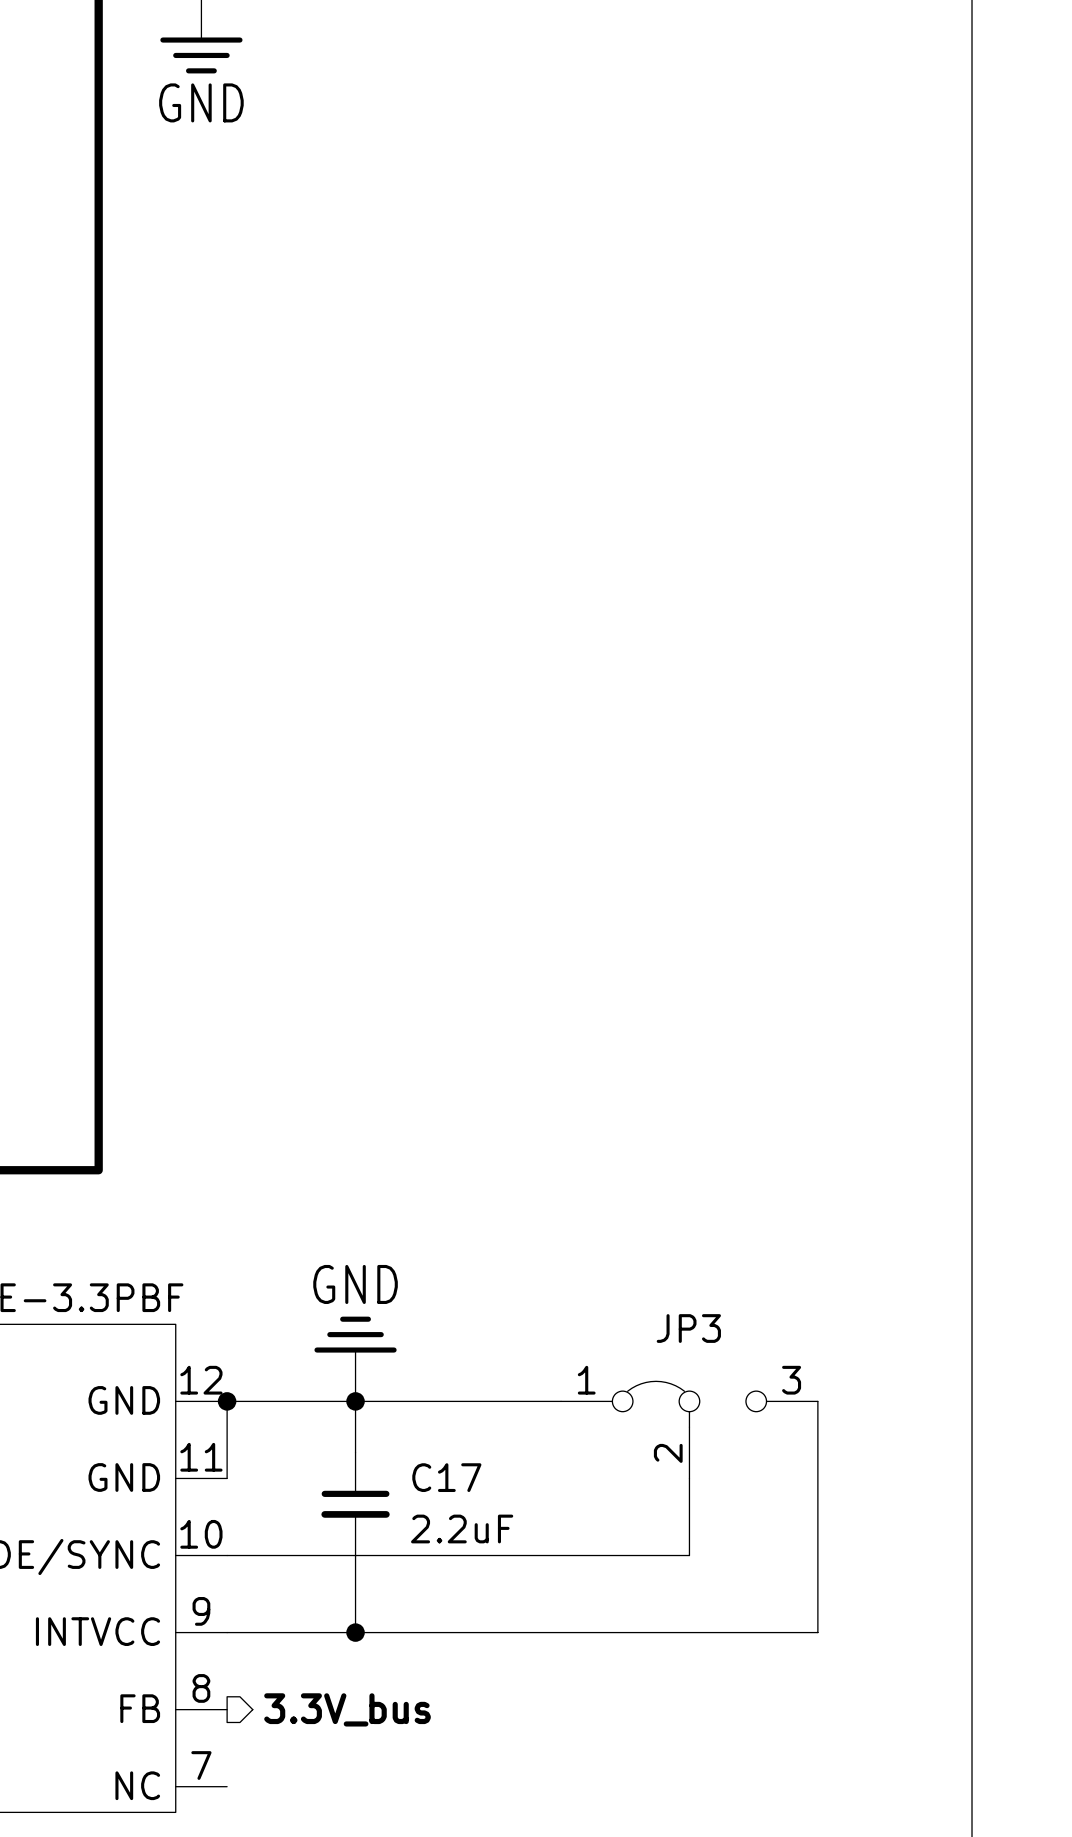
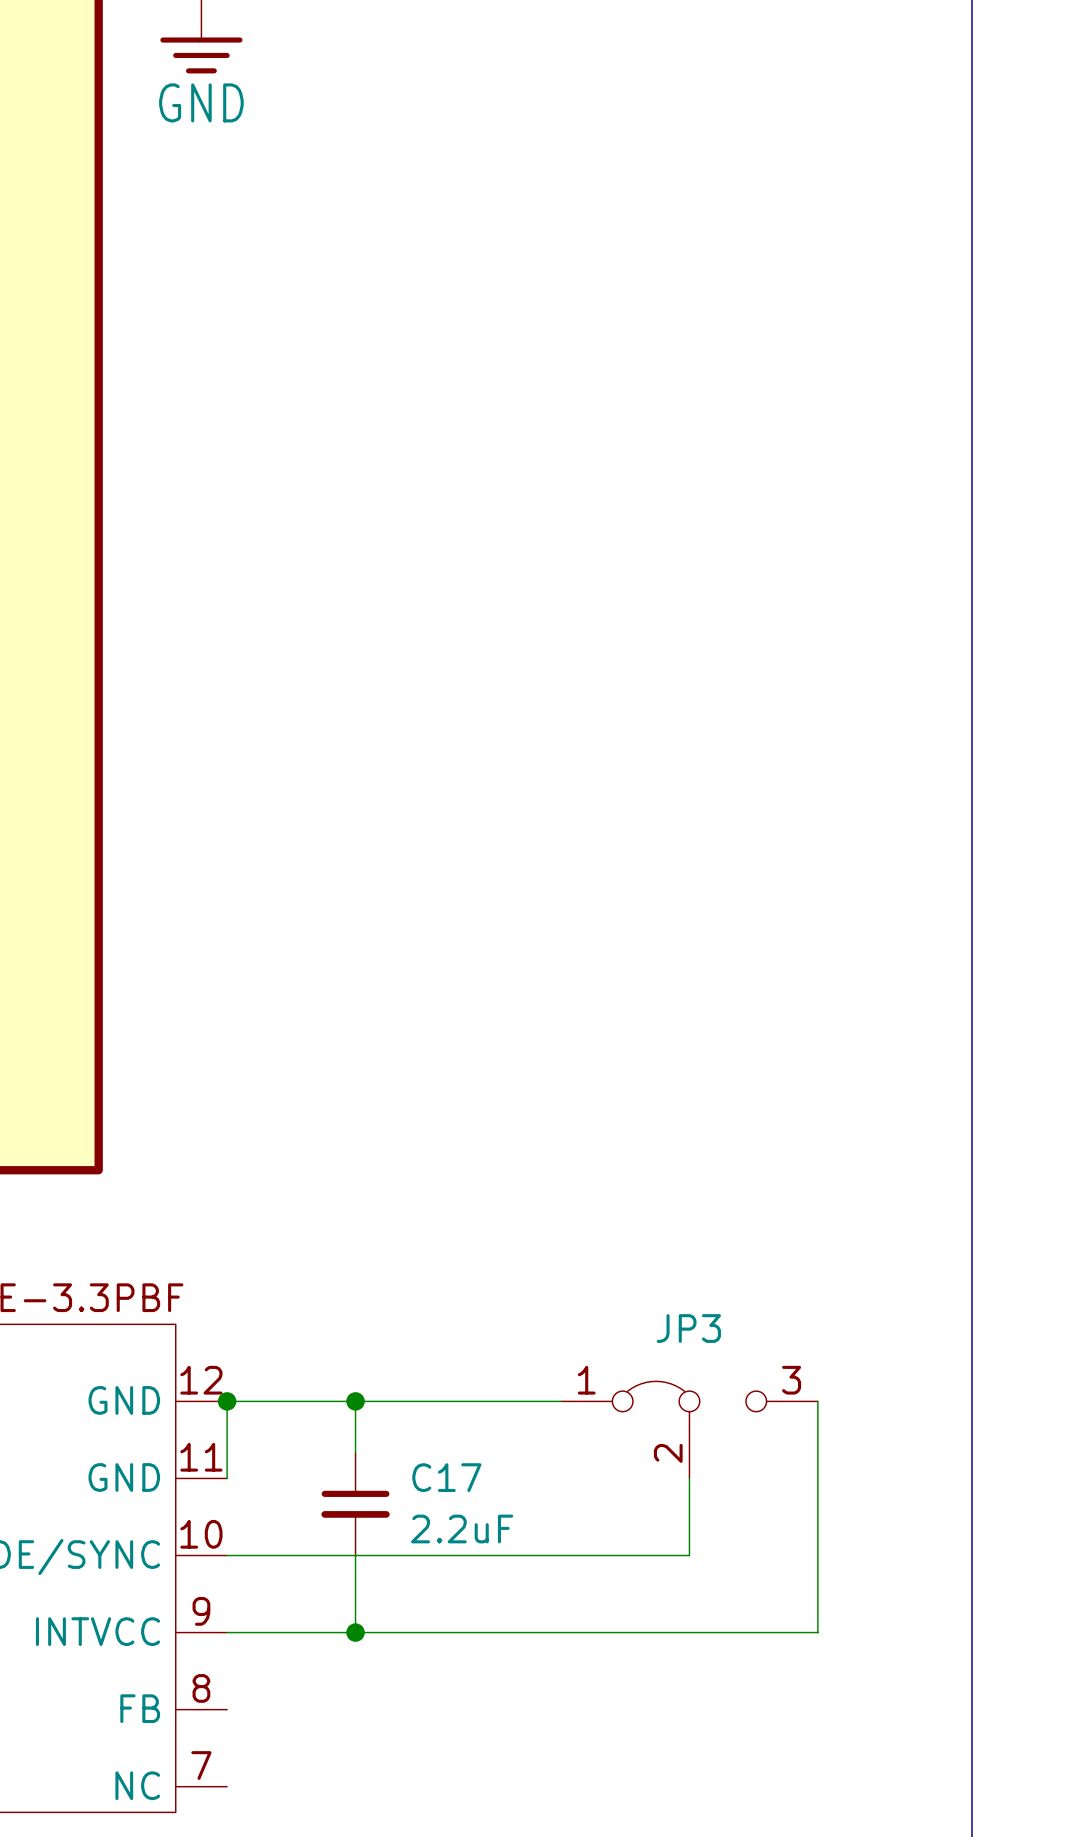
power symbol: GND (355, 1359) -> none
hierarchical label: 3.3V_bus (347, 1709) -> none

